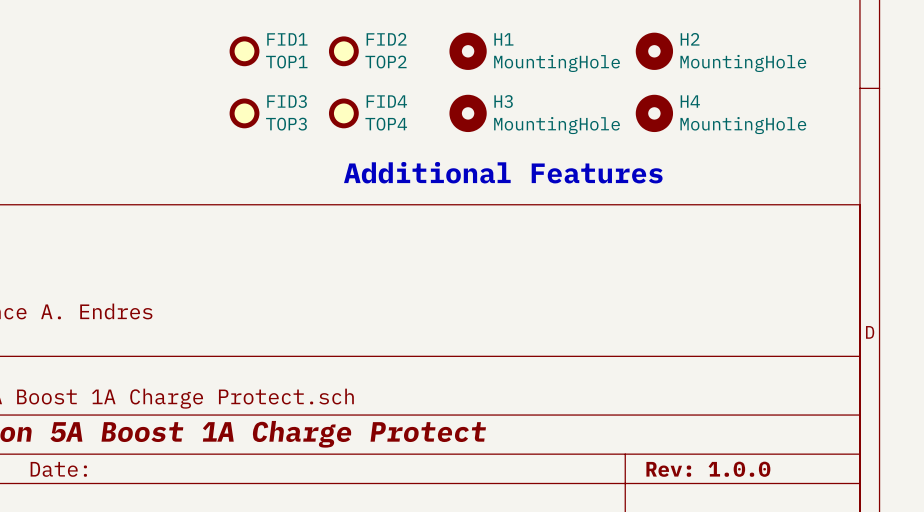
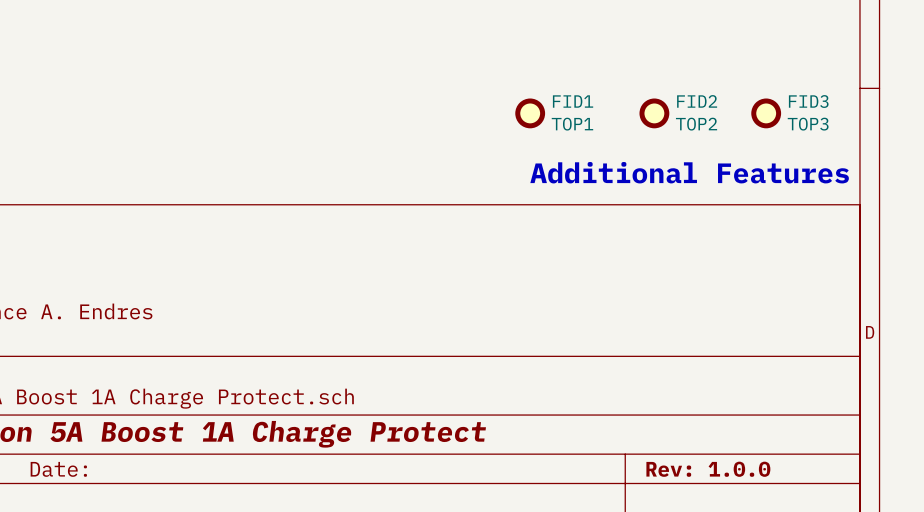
FID1 position: (244, 51) -> (530, 113)
FID2 position: (343, 51) -> (654, 113)
H1: MountingHole (468, 51) -> none
H2: MountingHole (654, 51) -> none
FID3 position: (244, 113) -> (766, 113)
FID4: (343, 113) -> none
H3: MountingHole (468, 113) -> none
H4: MountingHole (654, 113) -> none
text position: Additional Features (503, 172) -> Additional Features (689, 172)

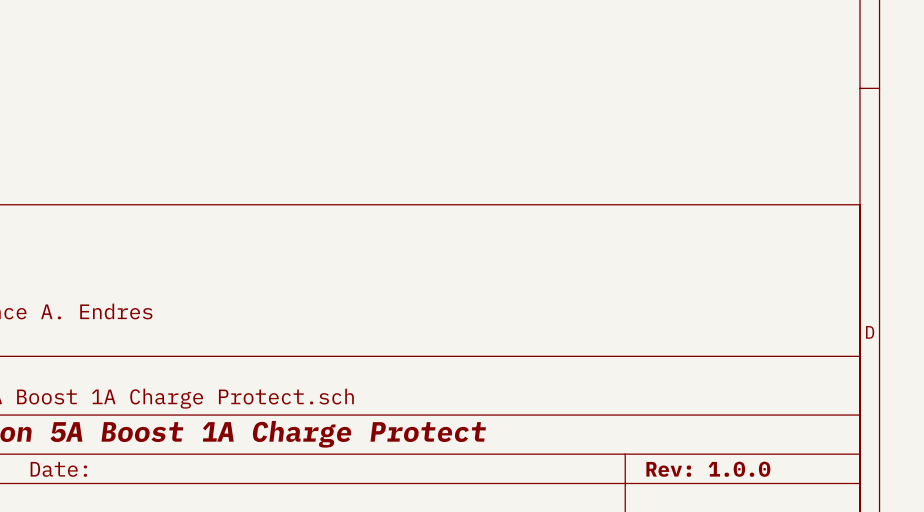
FID1: (530, 113) -> none
FID2: (654, 113) -> none
FID3: (766, 113) -> none
text: Additional Features (689, 172) -> none

